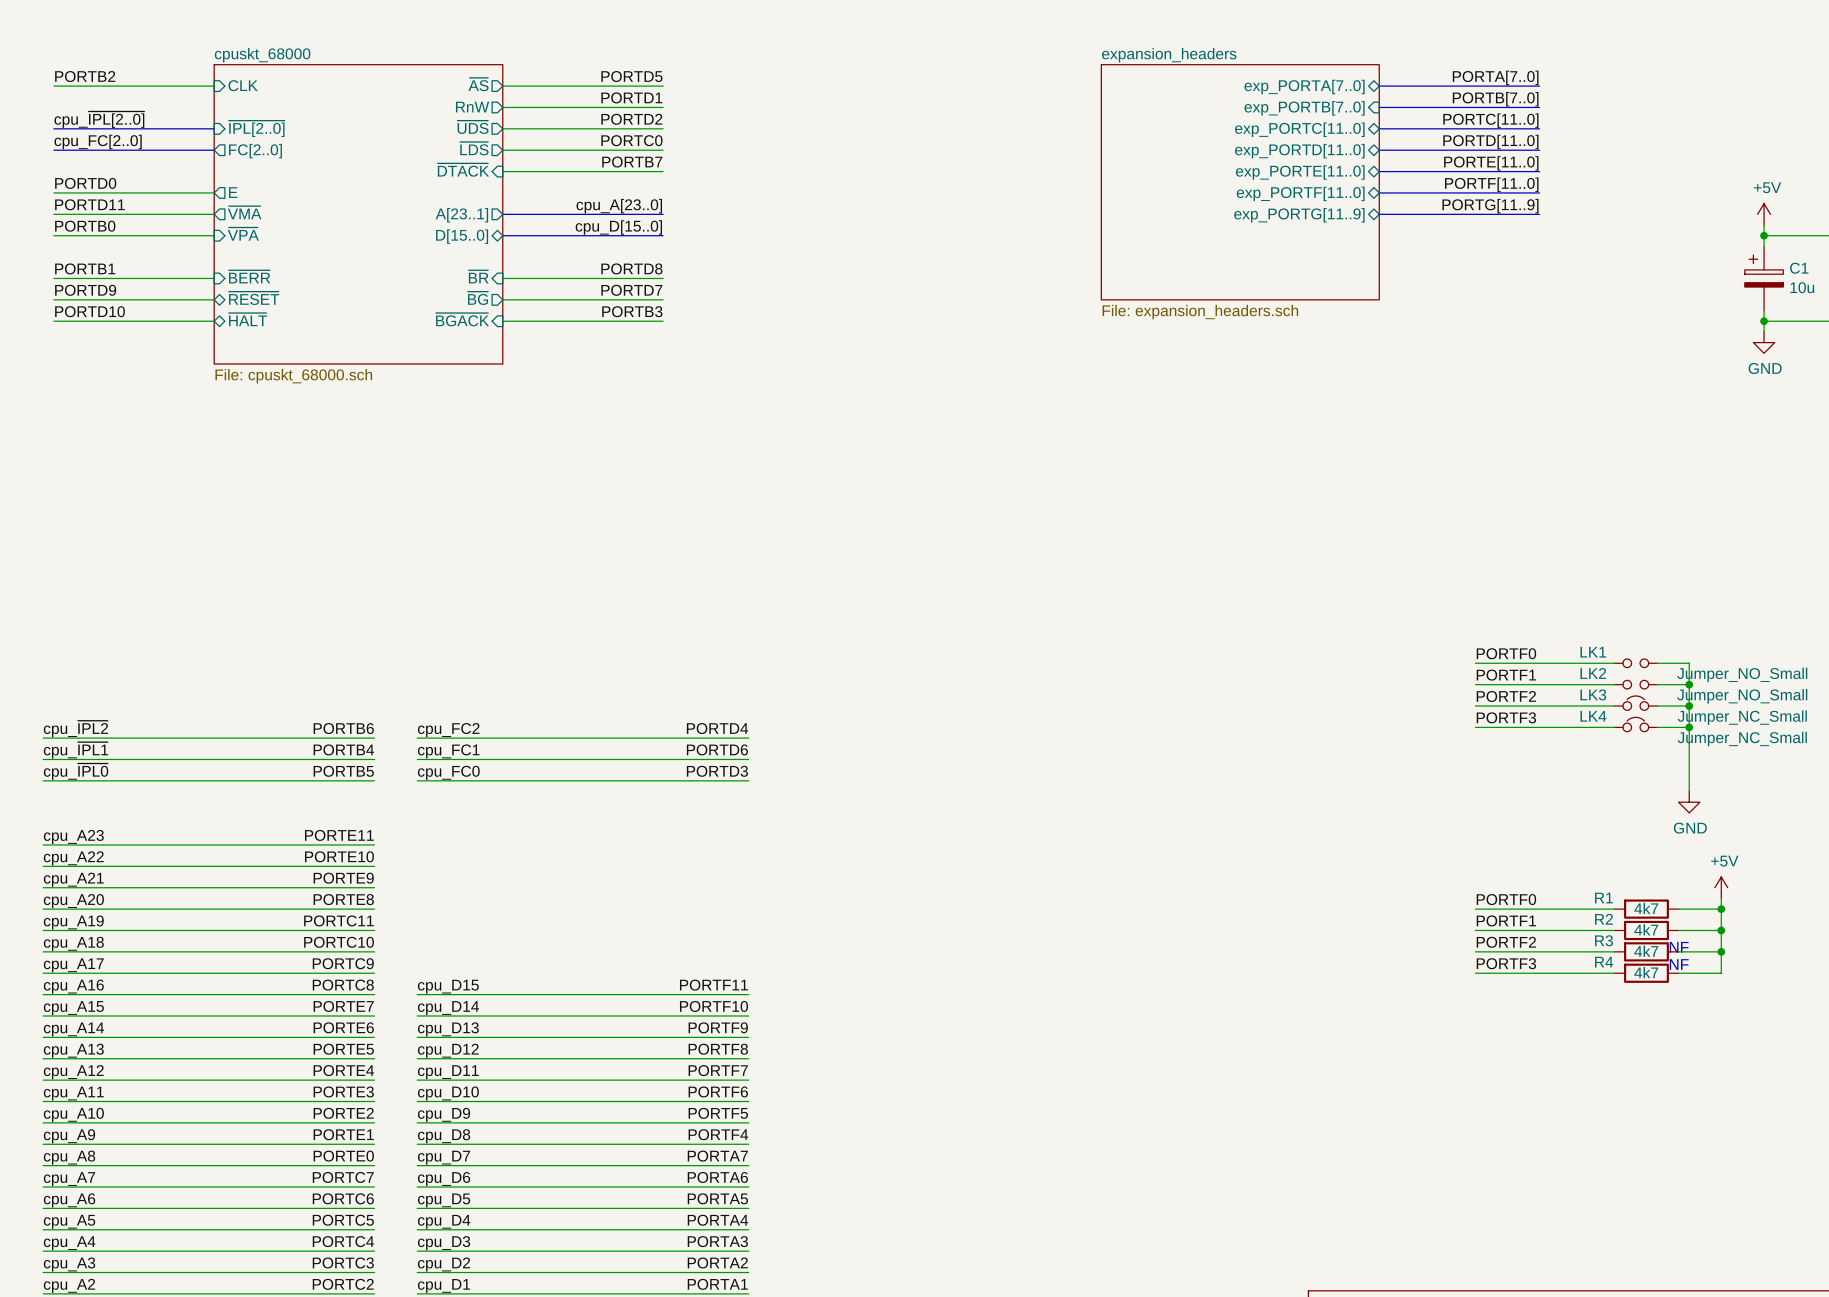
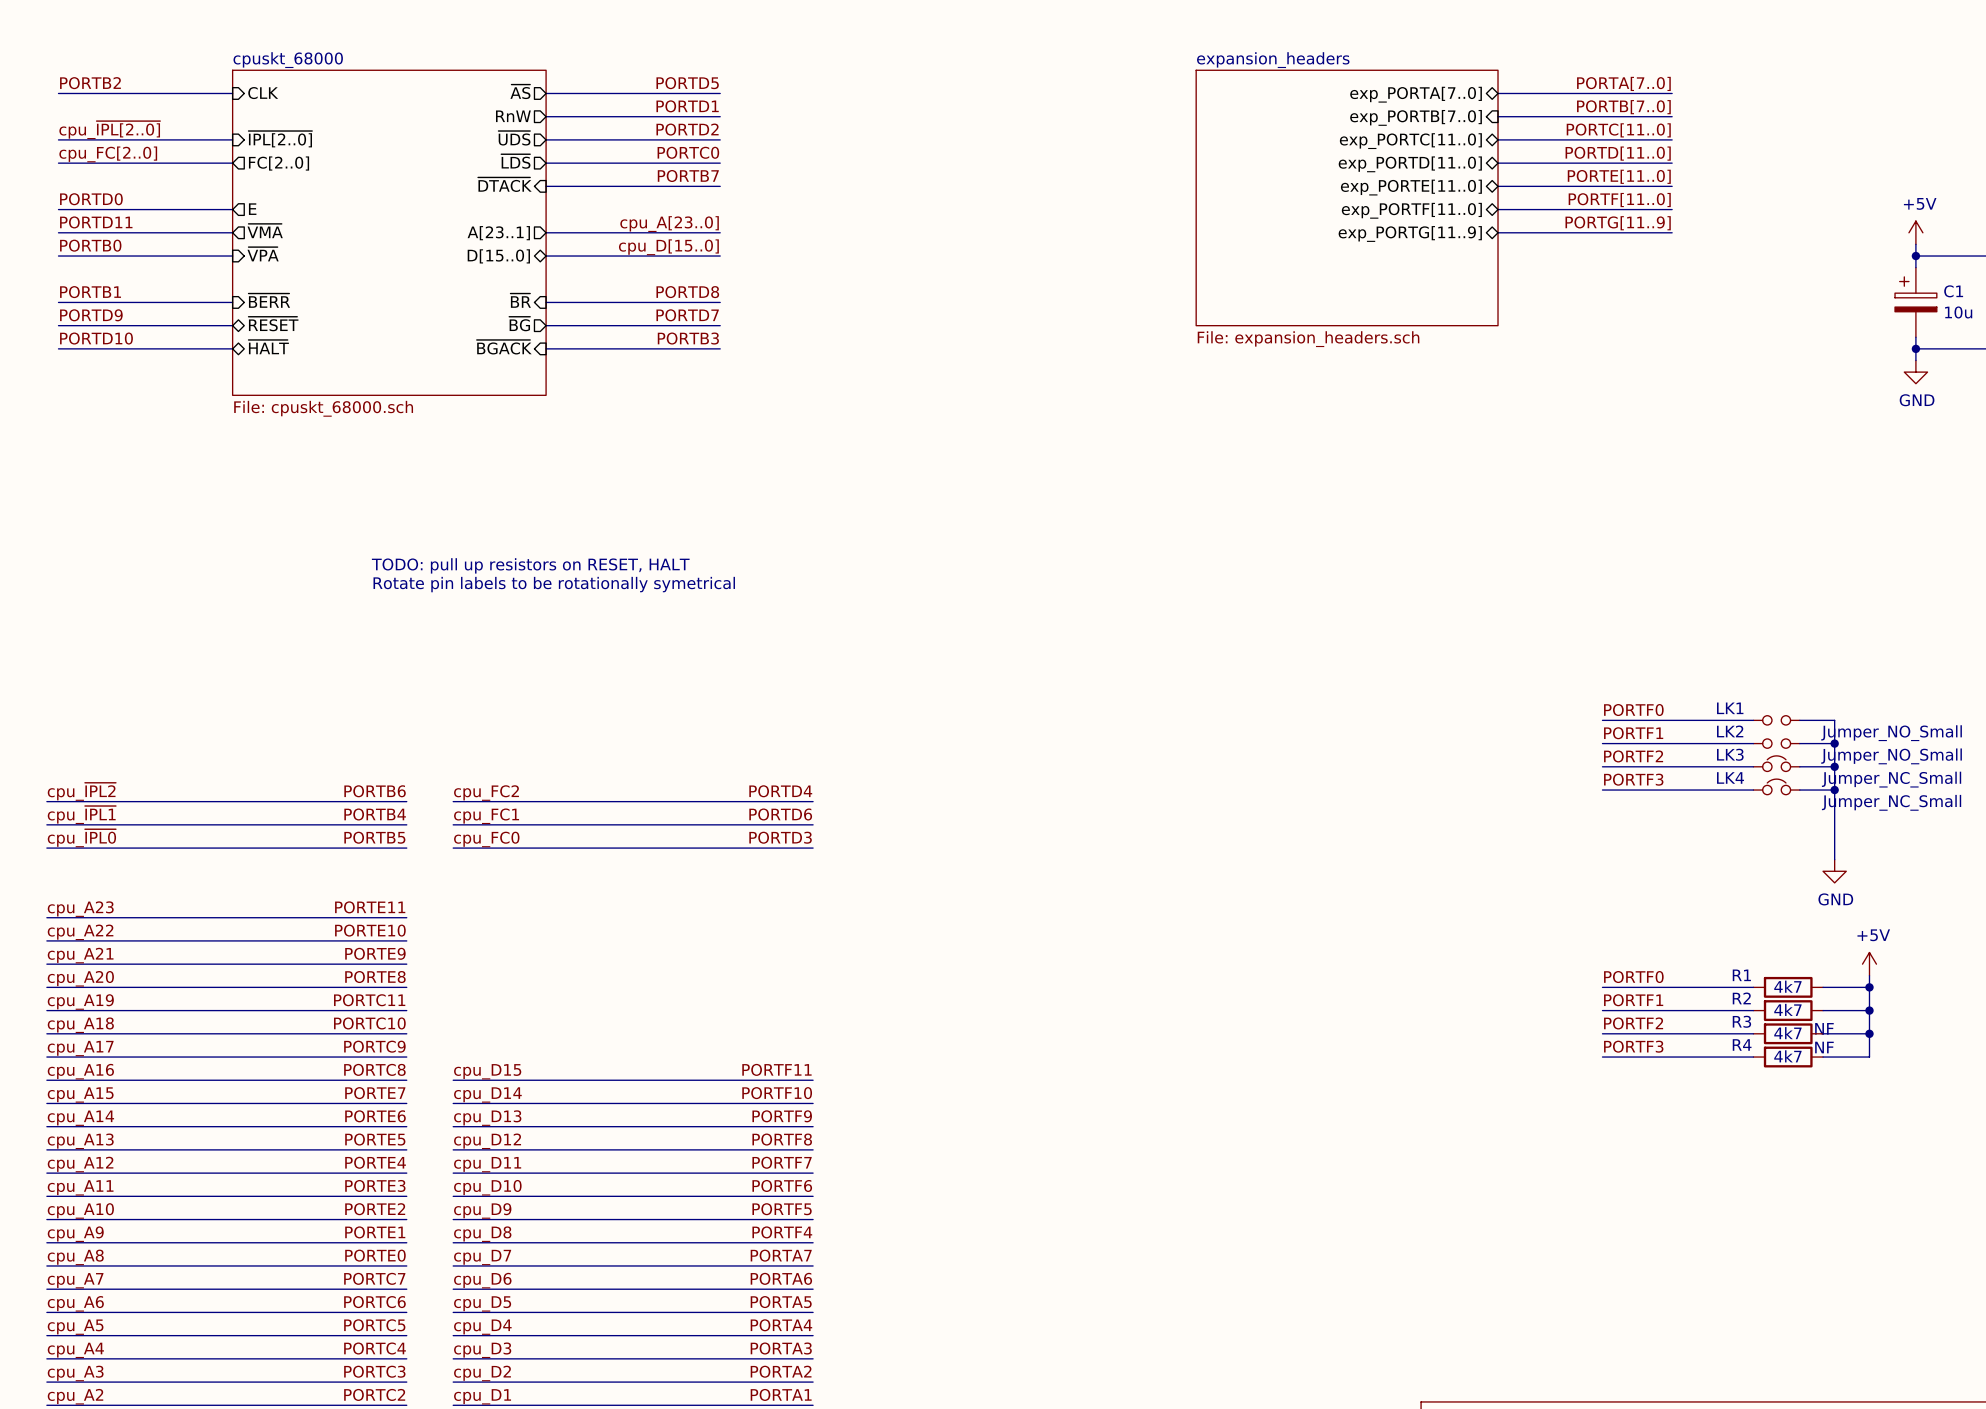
text: none -> TODO: pull up resistors on RESET, HALT (530, 565)
text: none -> Rotate pin labels to be rotationally symetrical (554, 584)

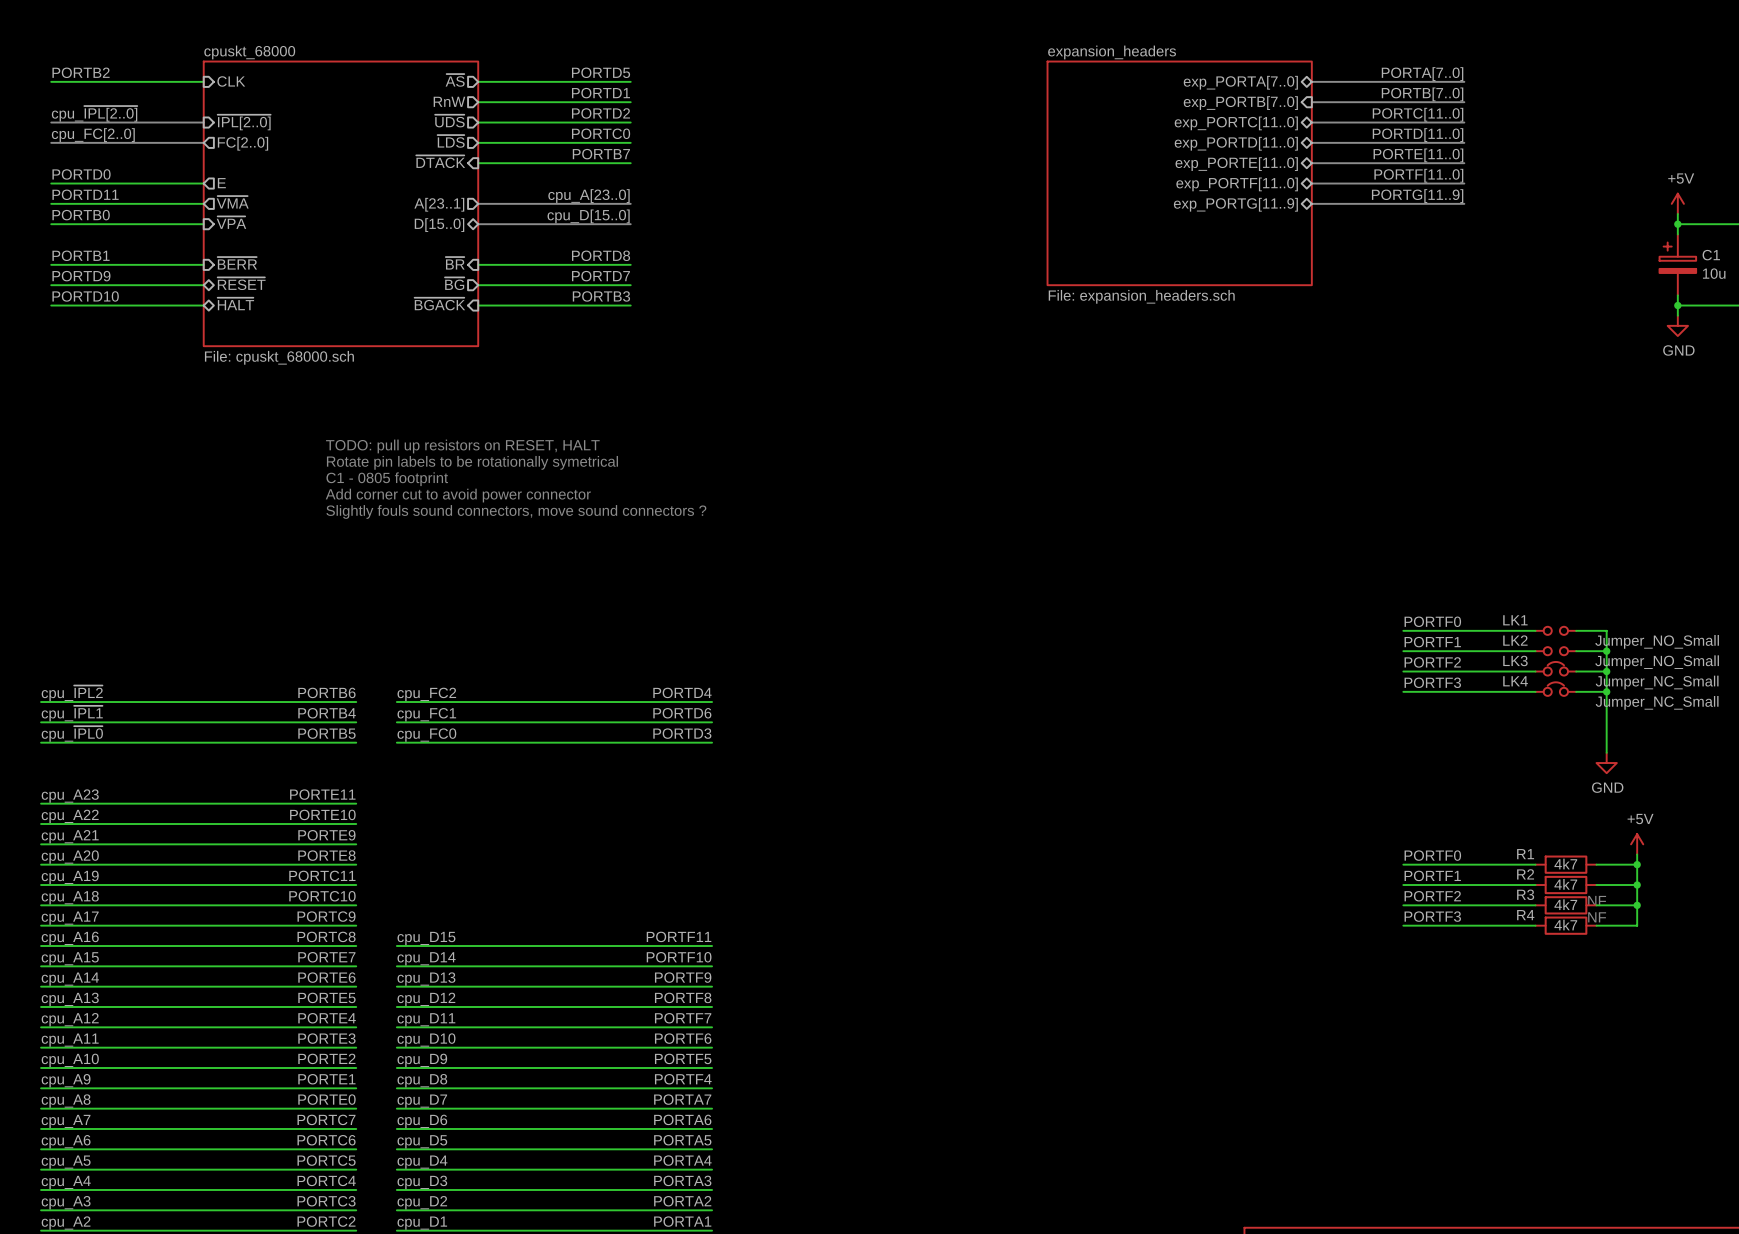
text: none -> TODO: pull up resistors on RESET, HALT (462, 446)
text: none -> Rotate pin labels to be rotationally symetrical (472, 462)
text: none -> C1 - 0805 footprint (387, 479)
text: TODO: pull up resistors on RESET, HALT (530, 565) -> Add corner cut to avoid power connector (458, 495)
text: Rotate pin labels to be rotationally symetrical (554, 584) -> Slightly fouls sound connectors, move sound connectors ? (516, 511)

